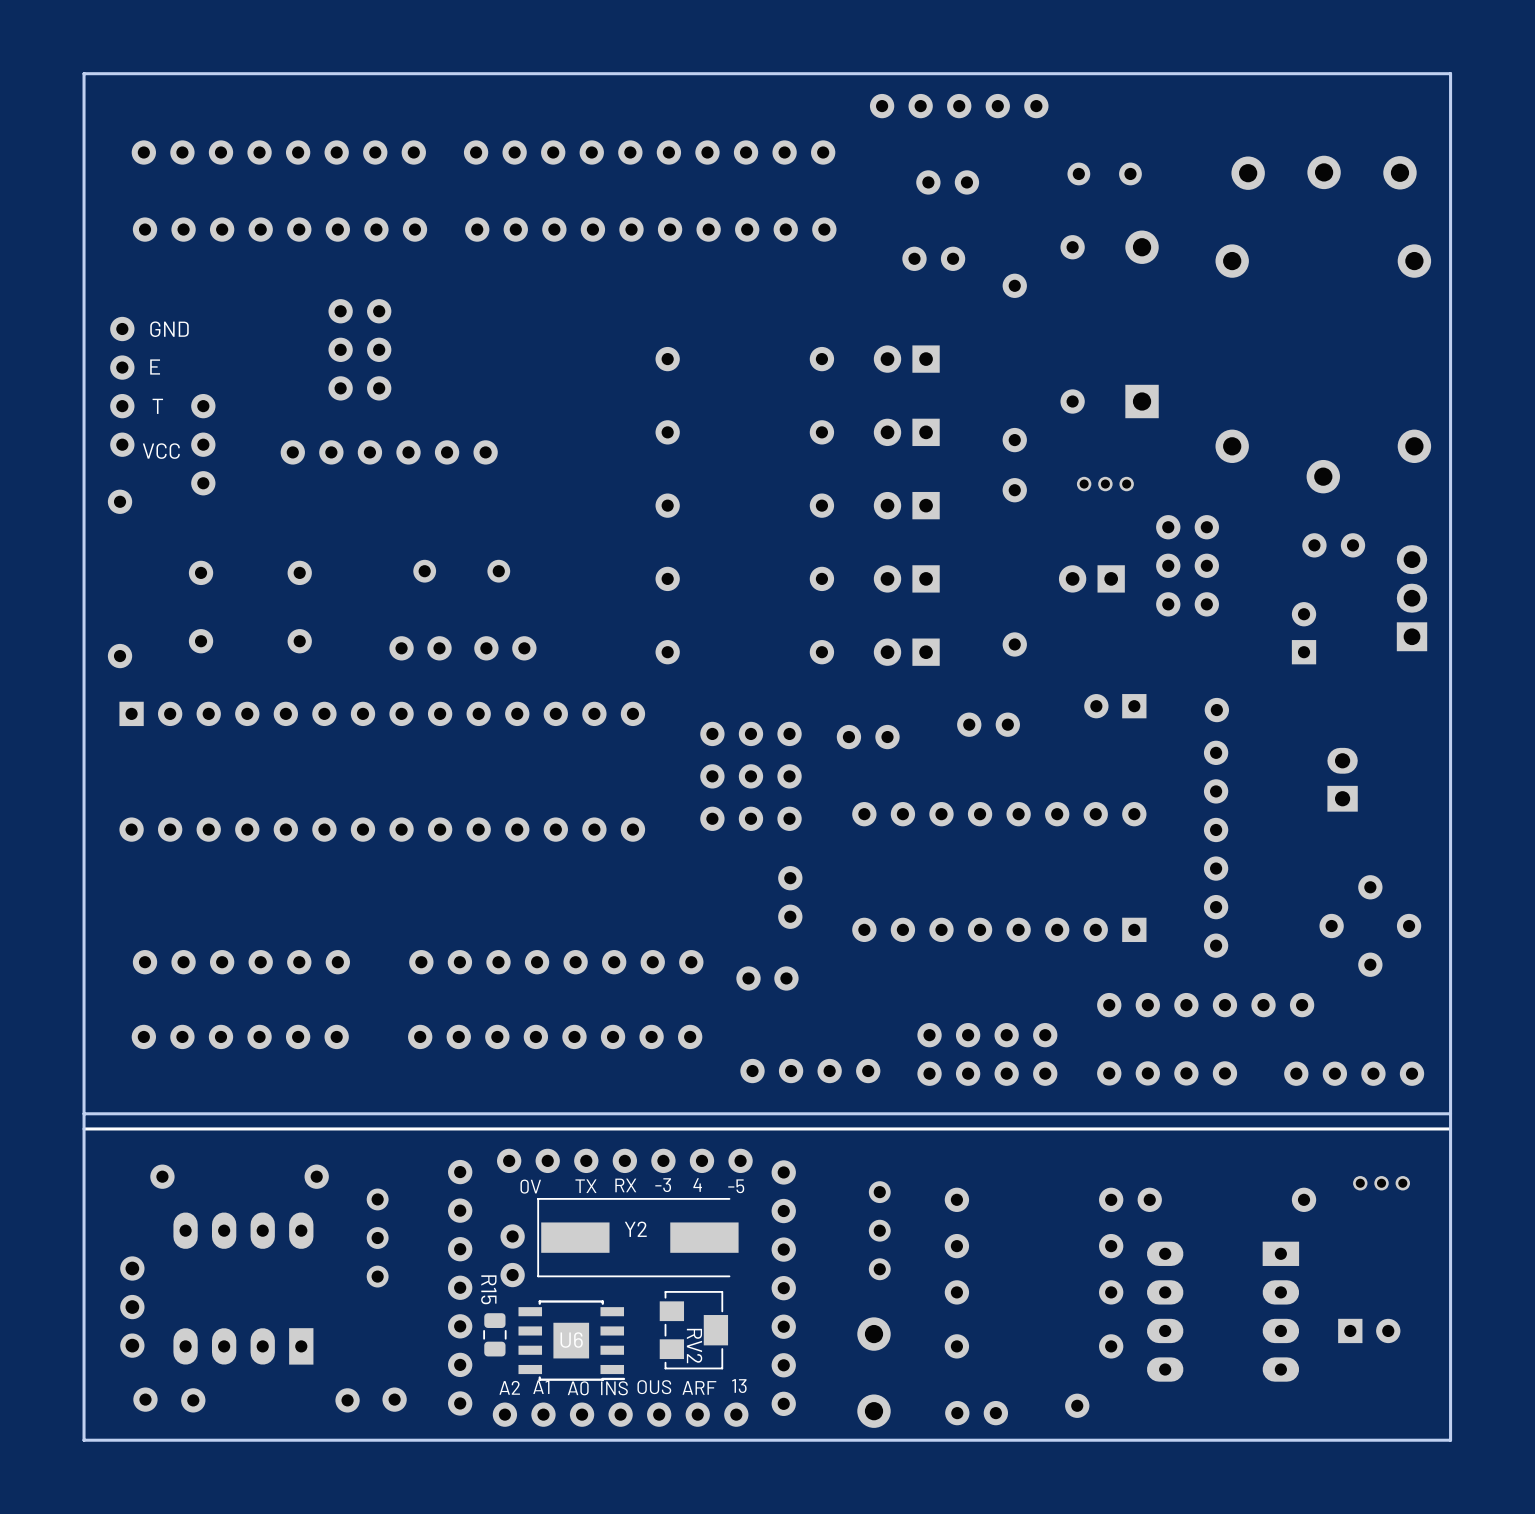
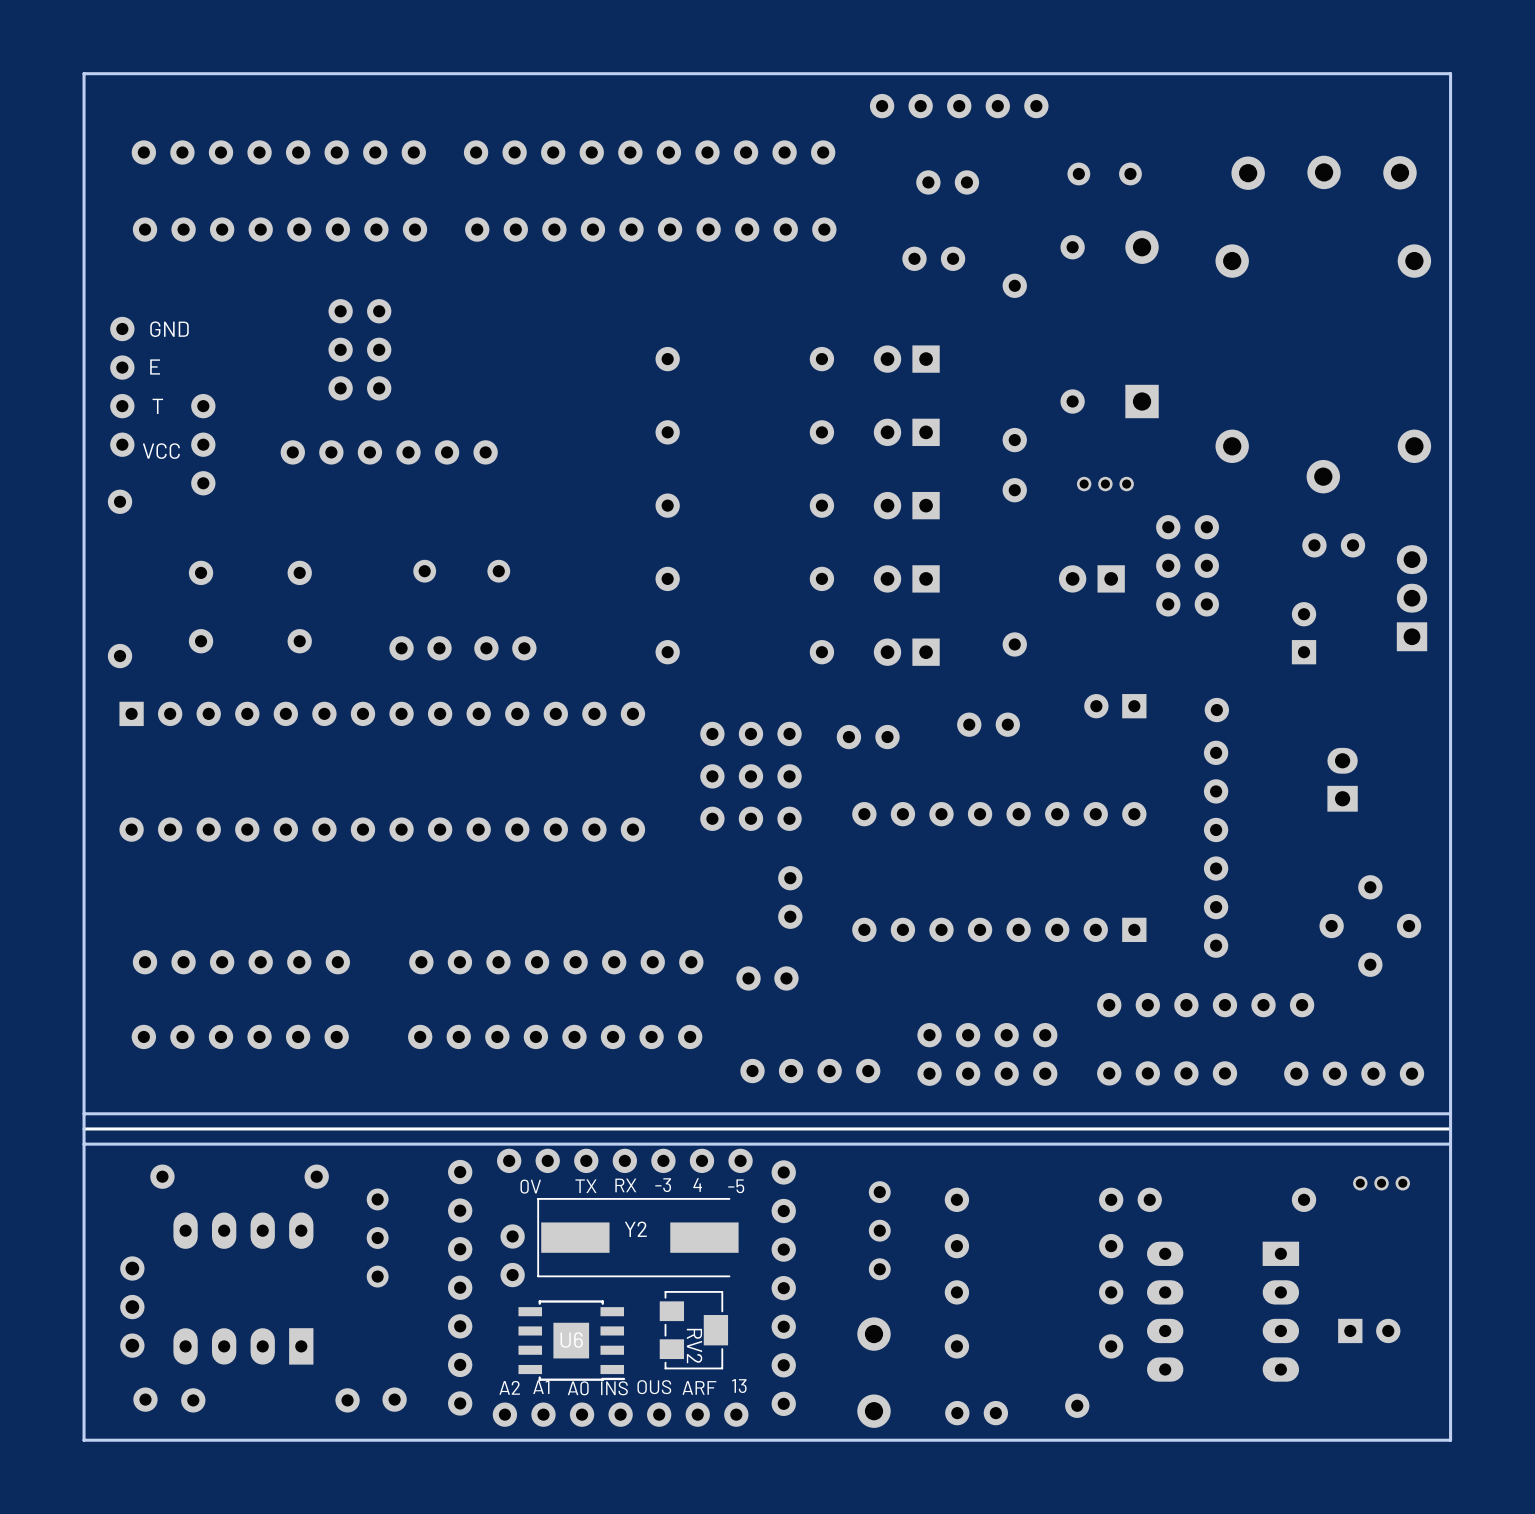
board edge: none -> (1450, 1144) (84, 1144)
R15: (494, 1334) -> none

